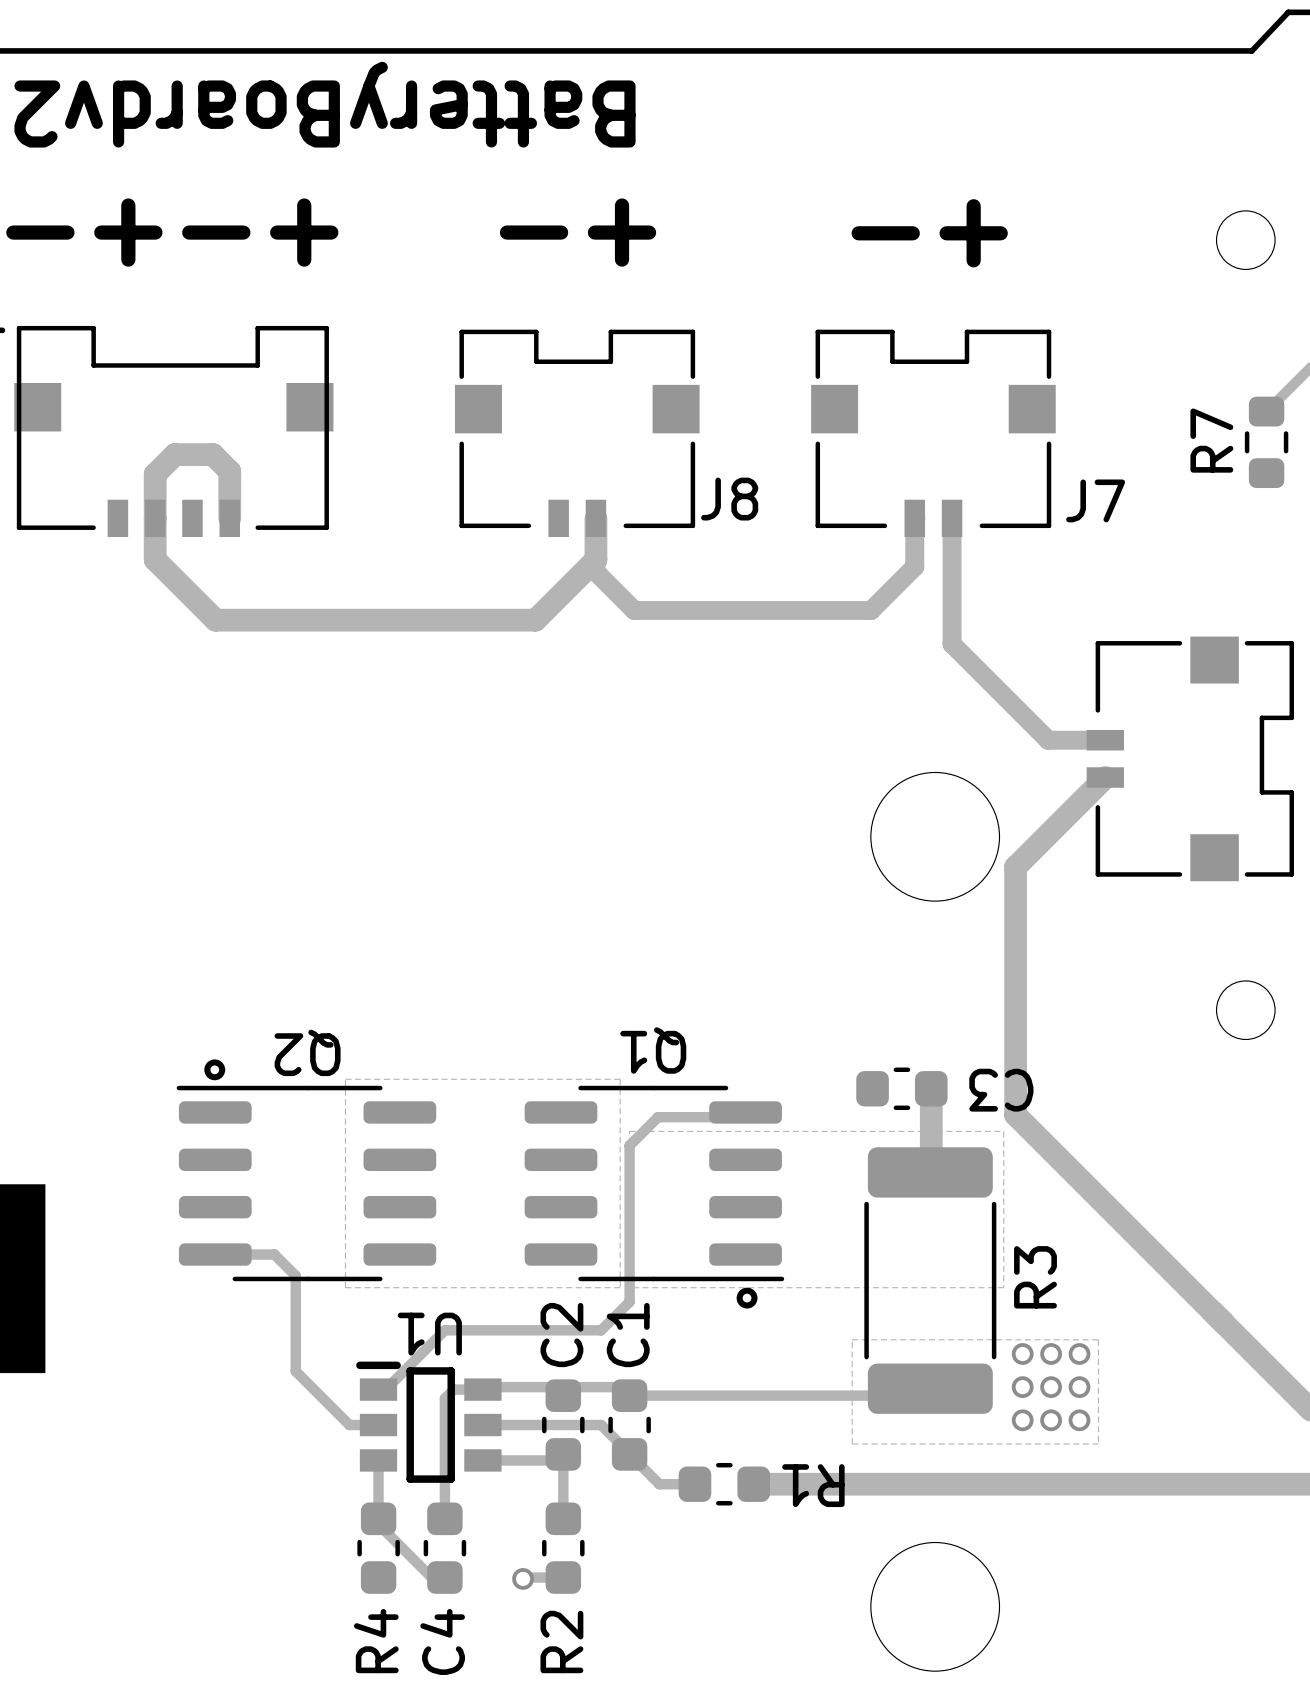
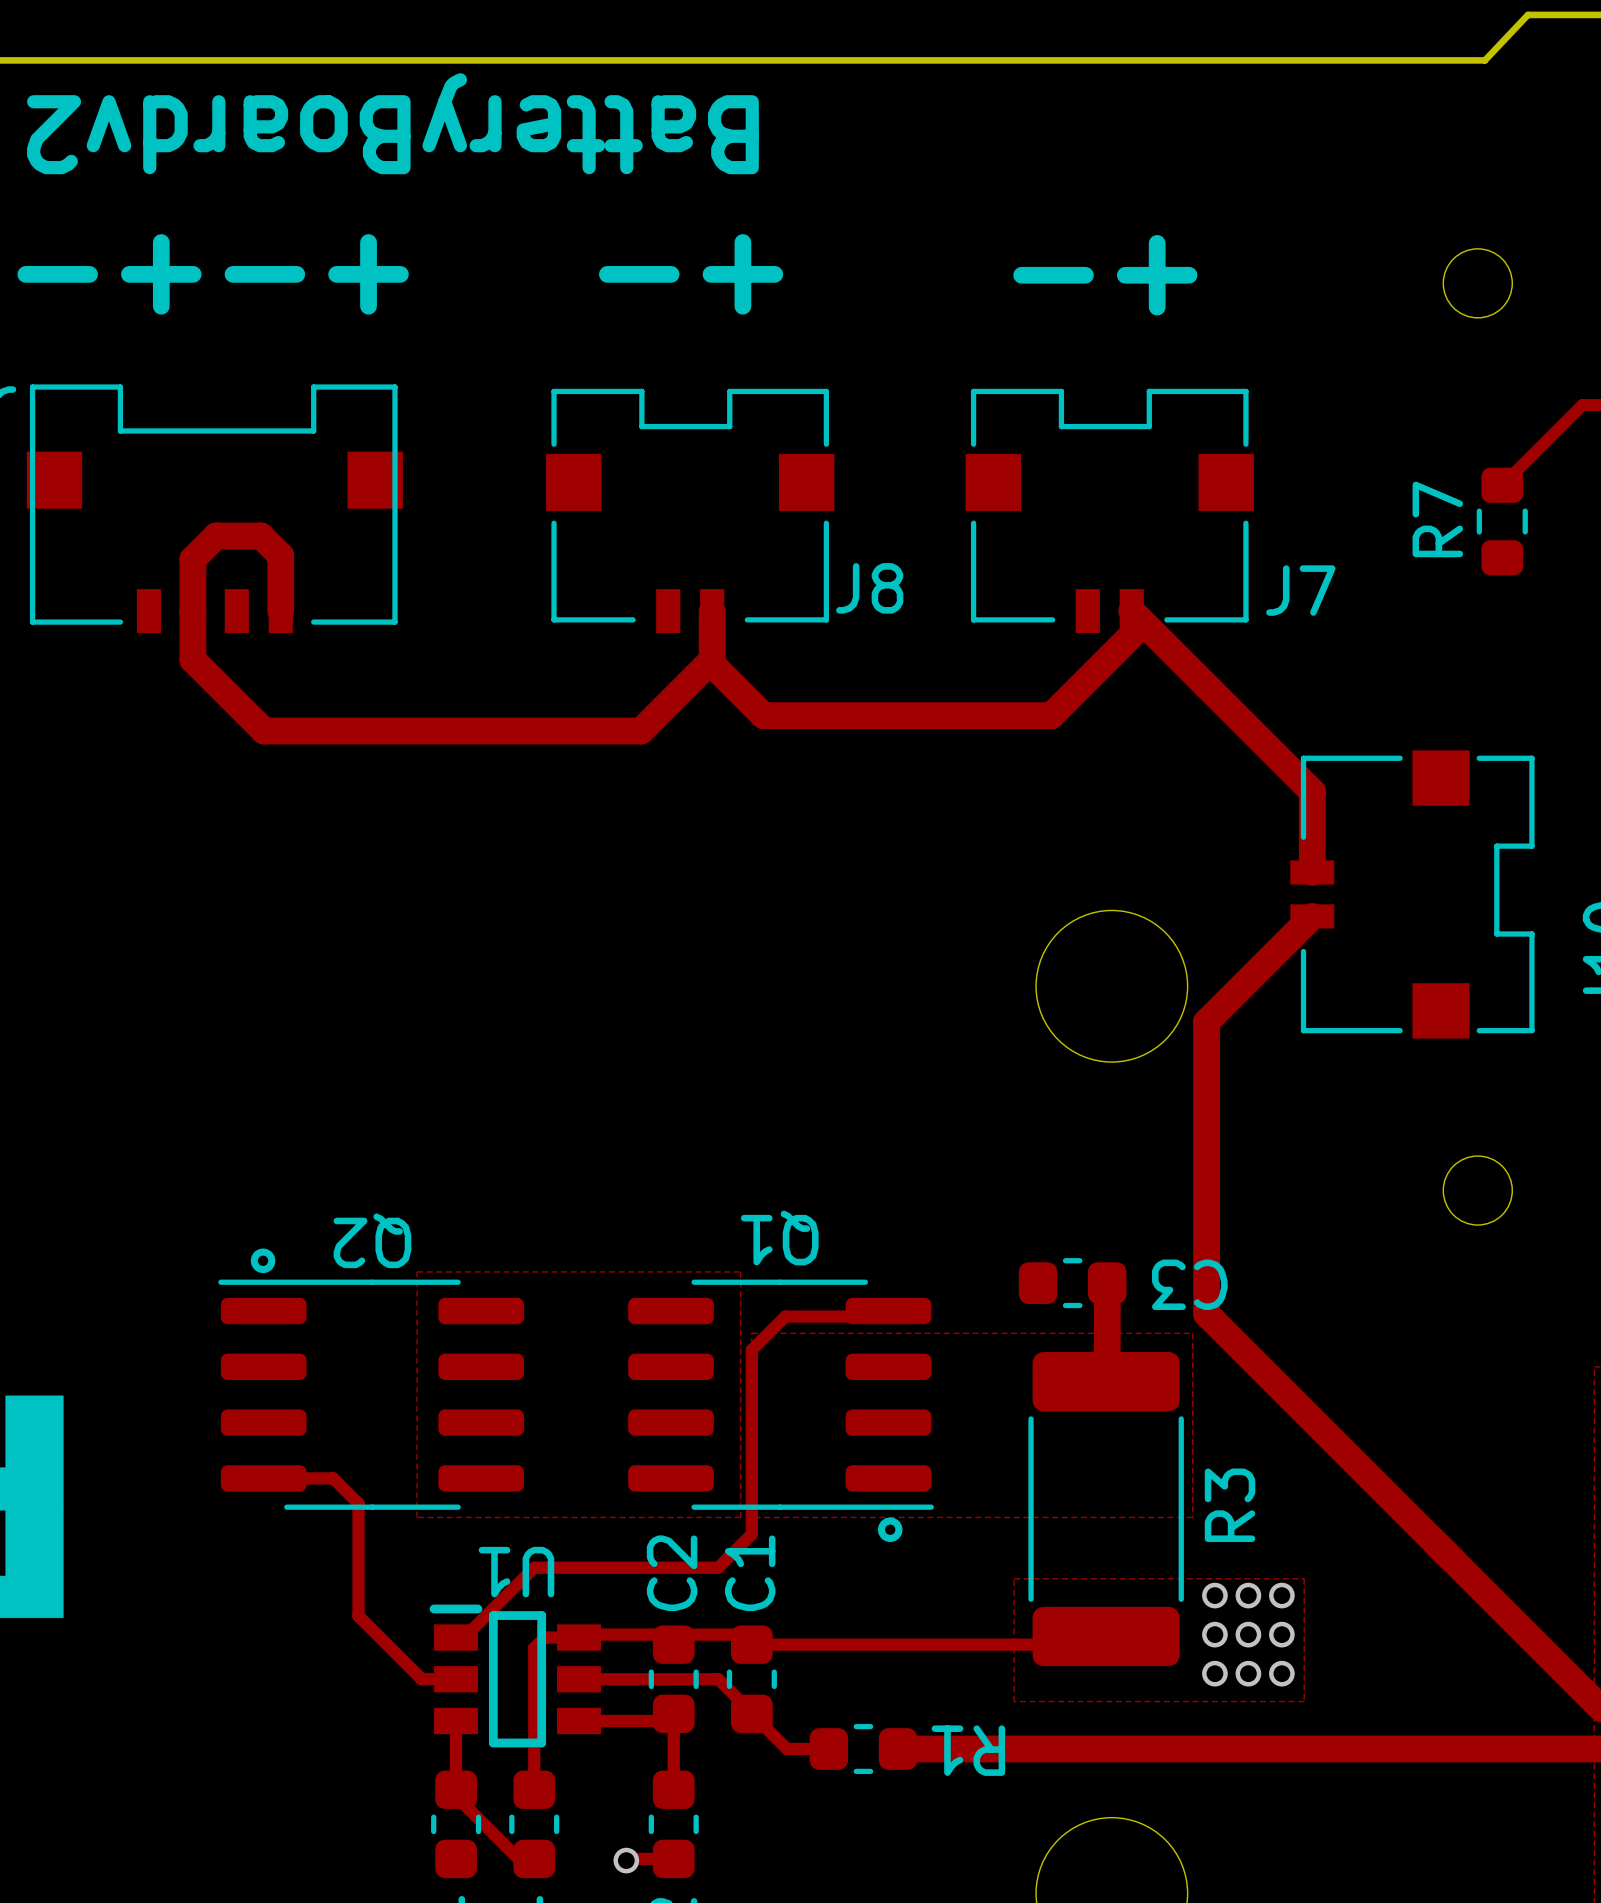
track: (915, 518) (914, 566) (871, 610) (634, 610) (595, 572) (595, 563) -> (1131, 635) (1051, 715) (763, 715) (712, 664)
track: (952, 538) (952, 644) (1048, 740) (1105, 740) -> (1131, 611) (1312, 791) (1312, 872)

